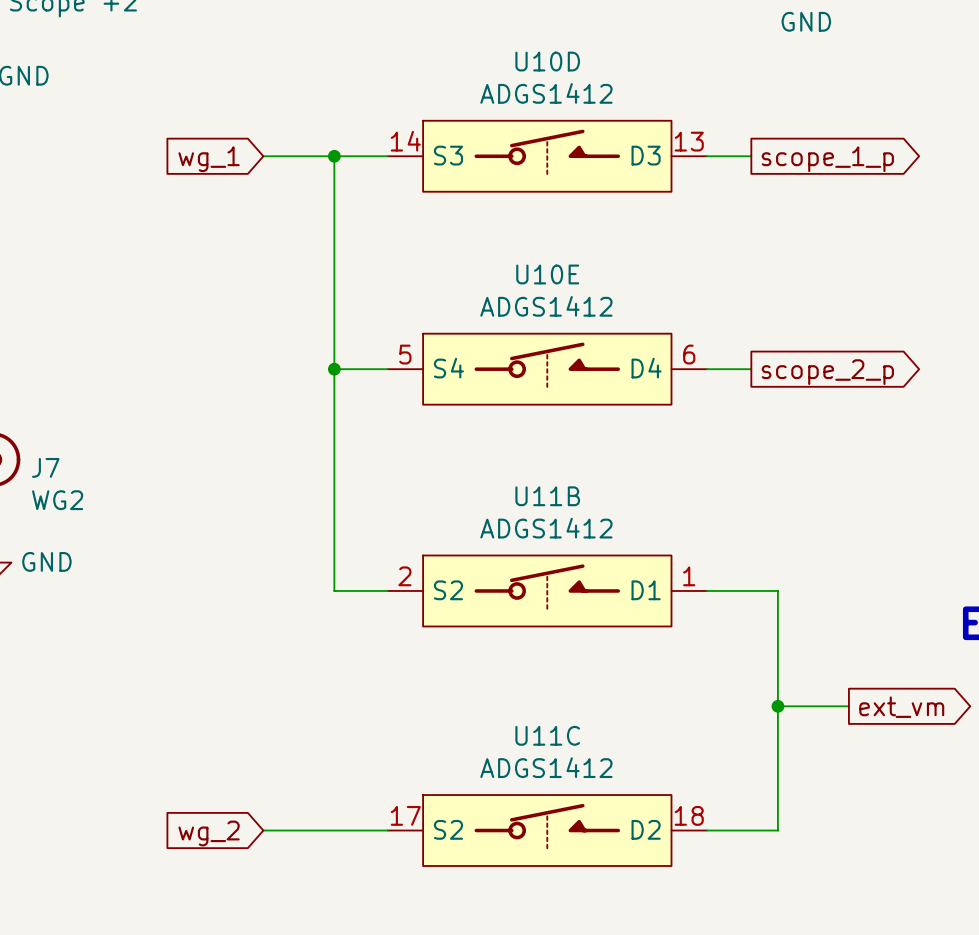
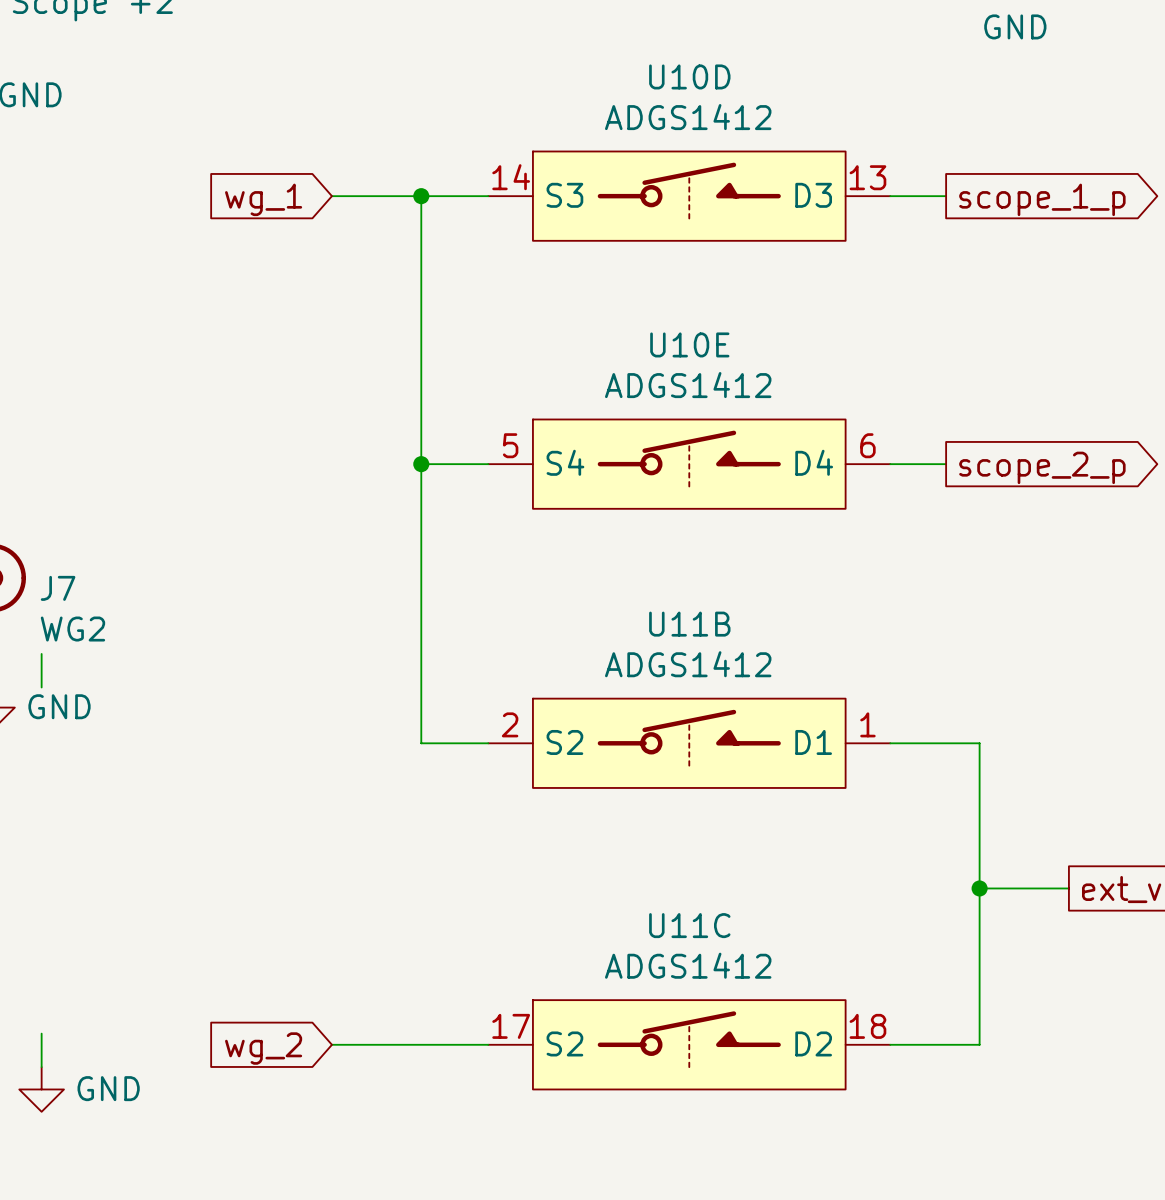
wire: none -> (41, 653) (41, 687)
wire: none -> (41, 1033) (41, 1067)
power symbol: none -> GND (41, 1089)

